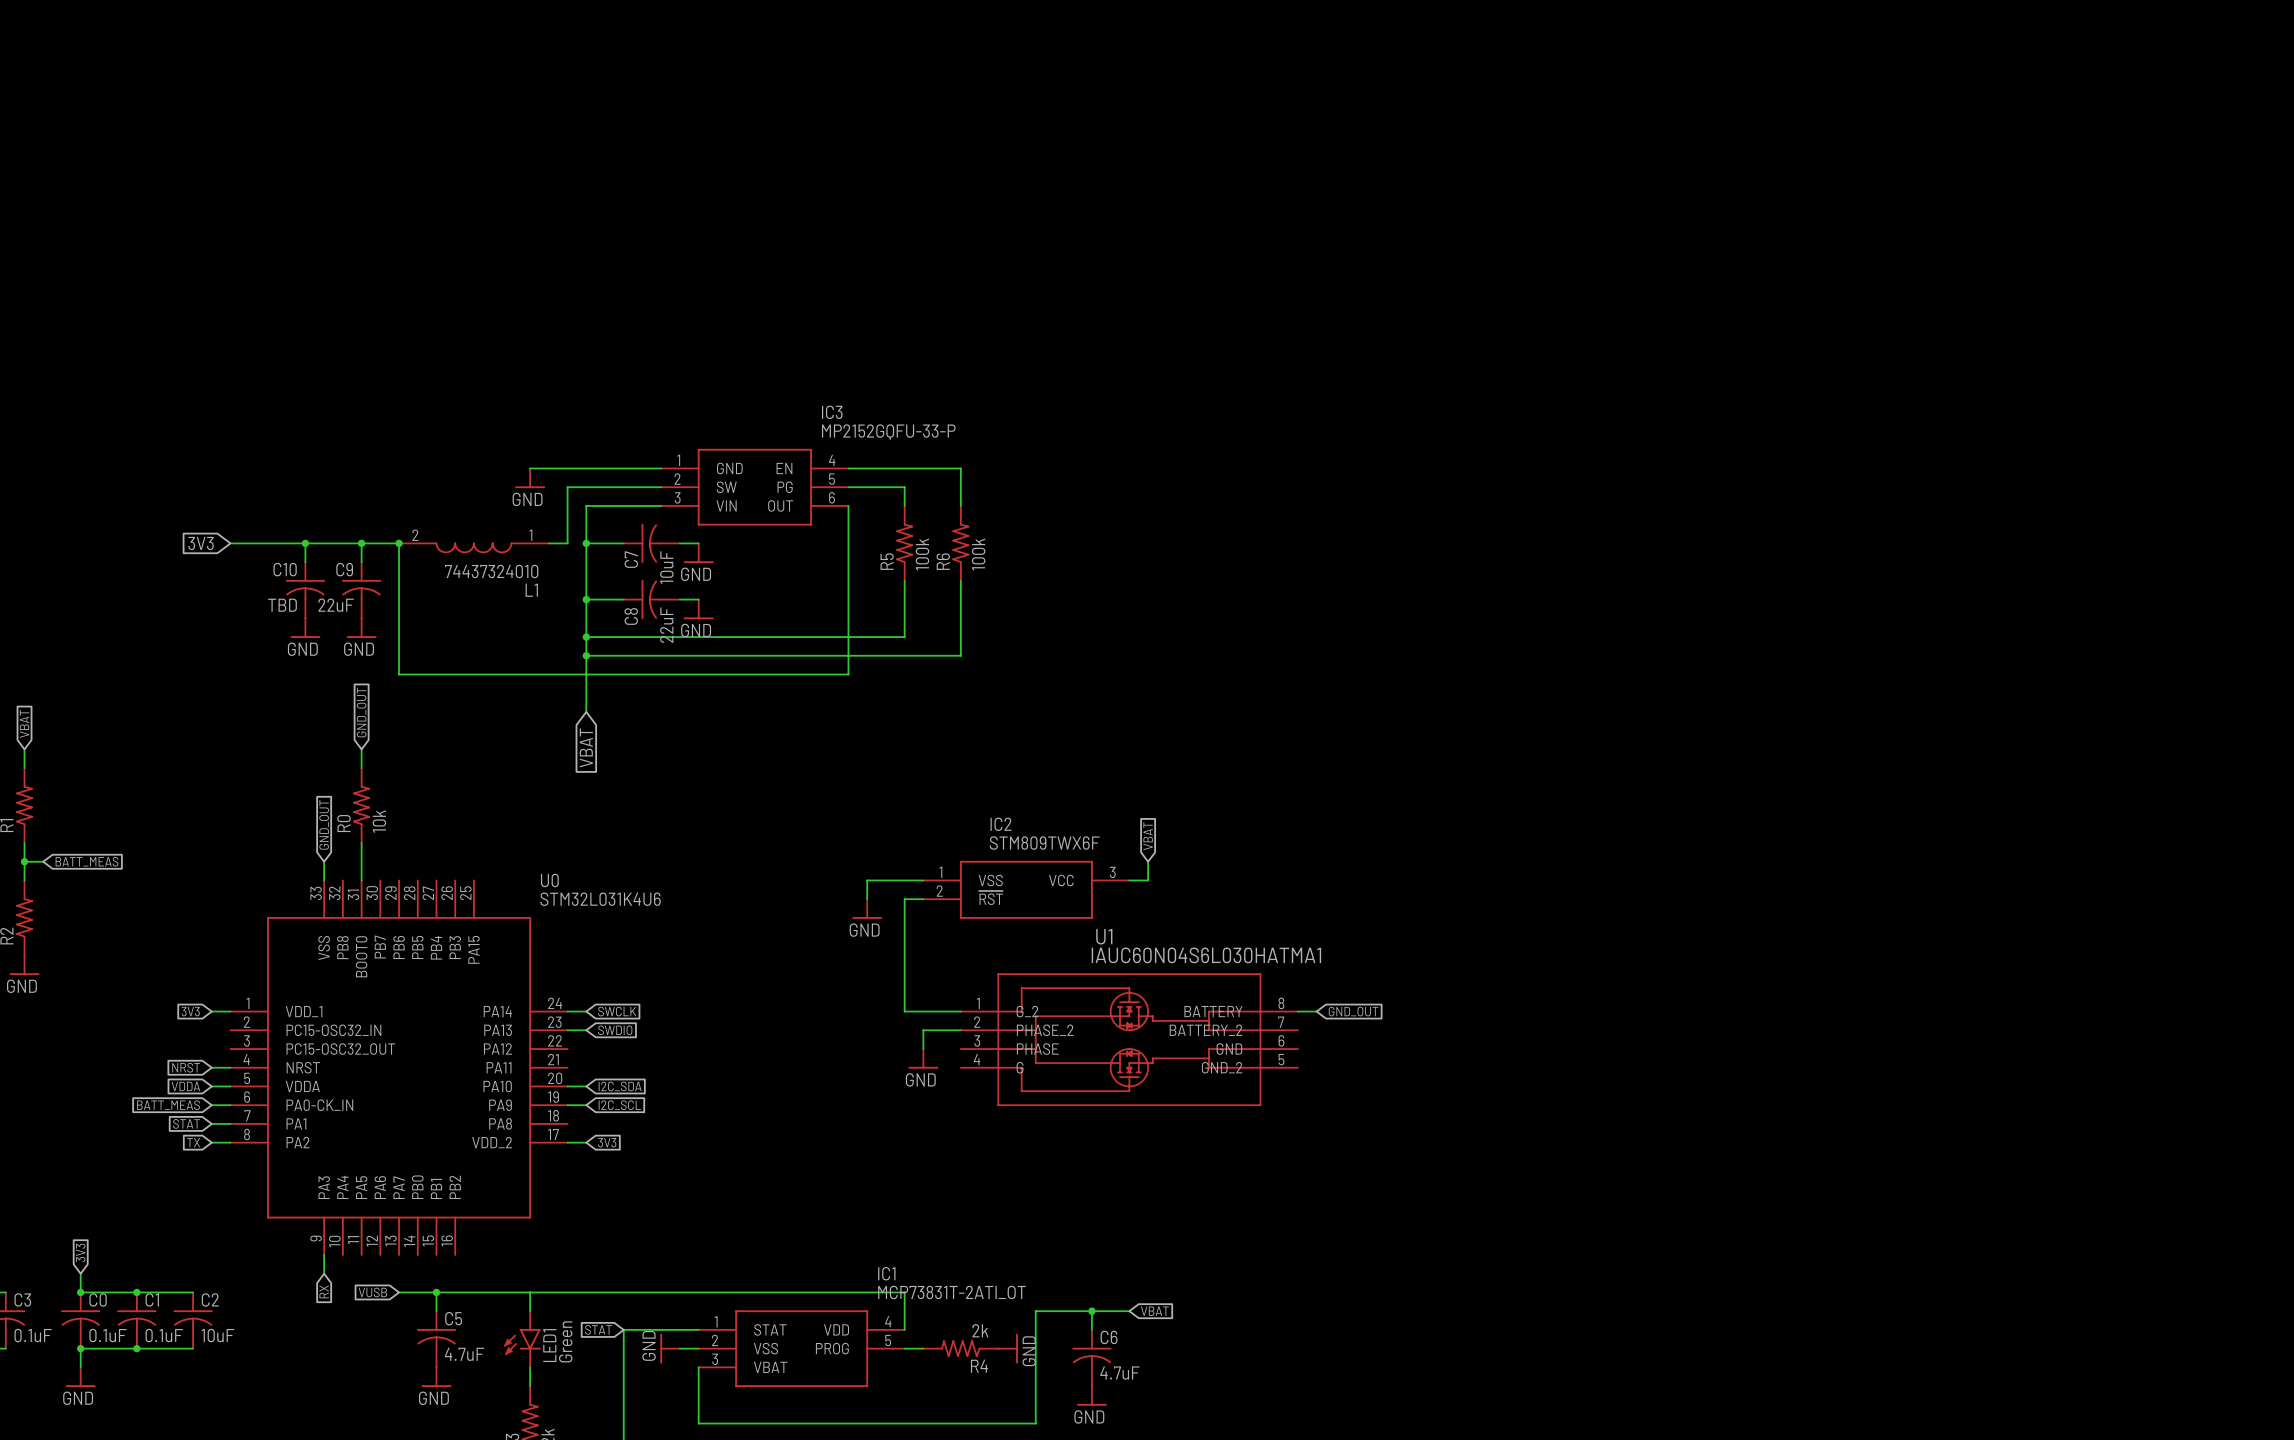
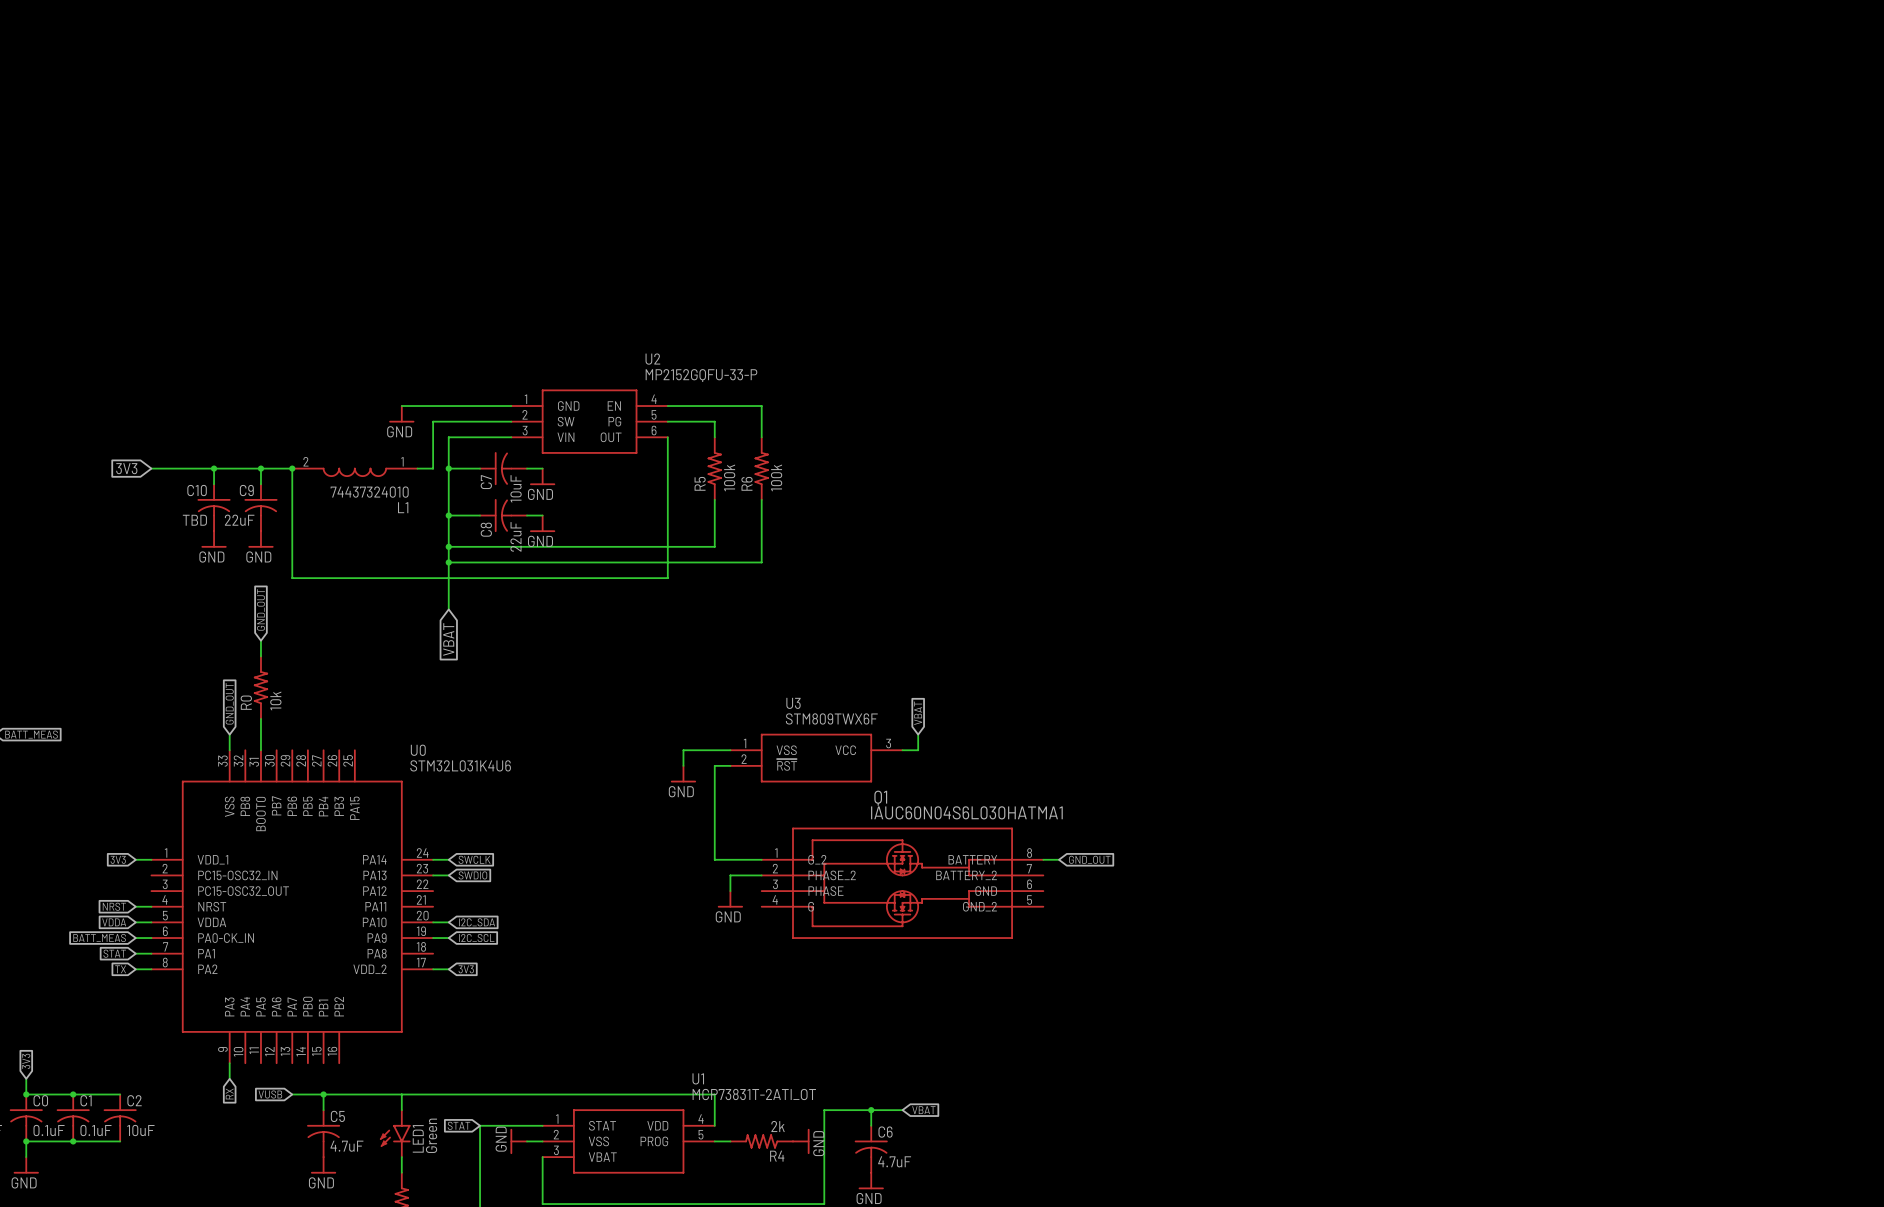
IC3 name: IC3 (832, 412) -> U2 (652, 359)
IC2 name: IC2 (1001, 824) -> U3 (793, 703)
U1 name: U1 (1104, 936) -> Q1 (880, 798)
IC1 name: IC1 (886, 1273) -> U1 (698, 1078)

